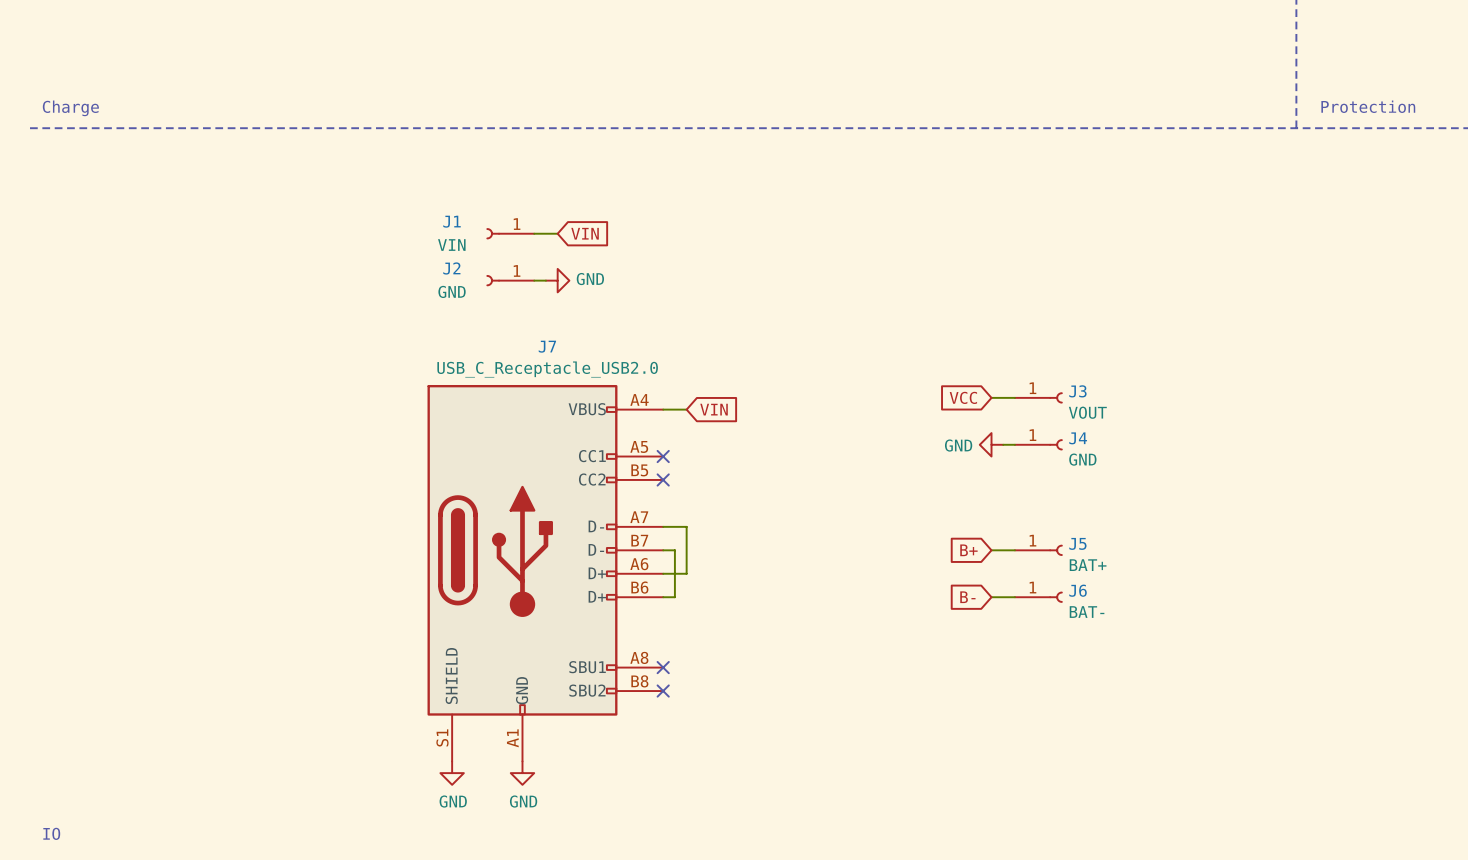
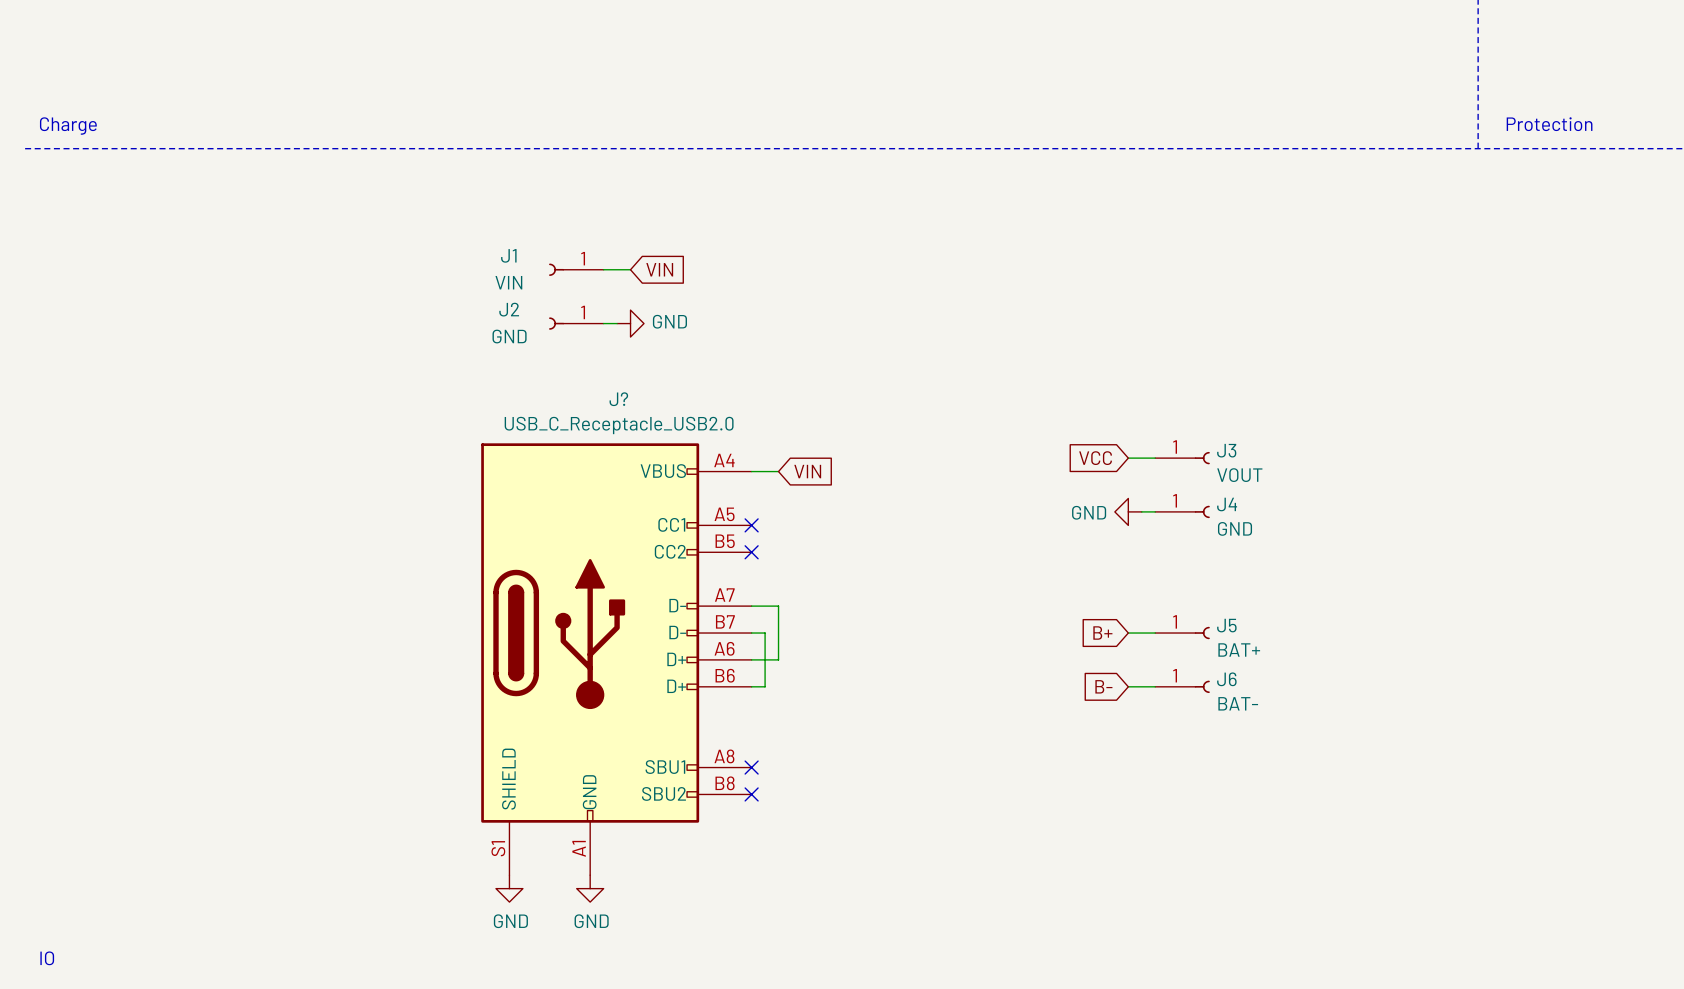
J7 name: J7 (547, 346) -> J? (618, 399)

